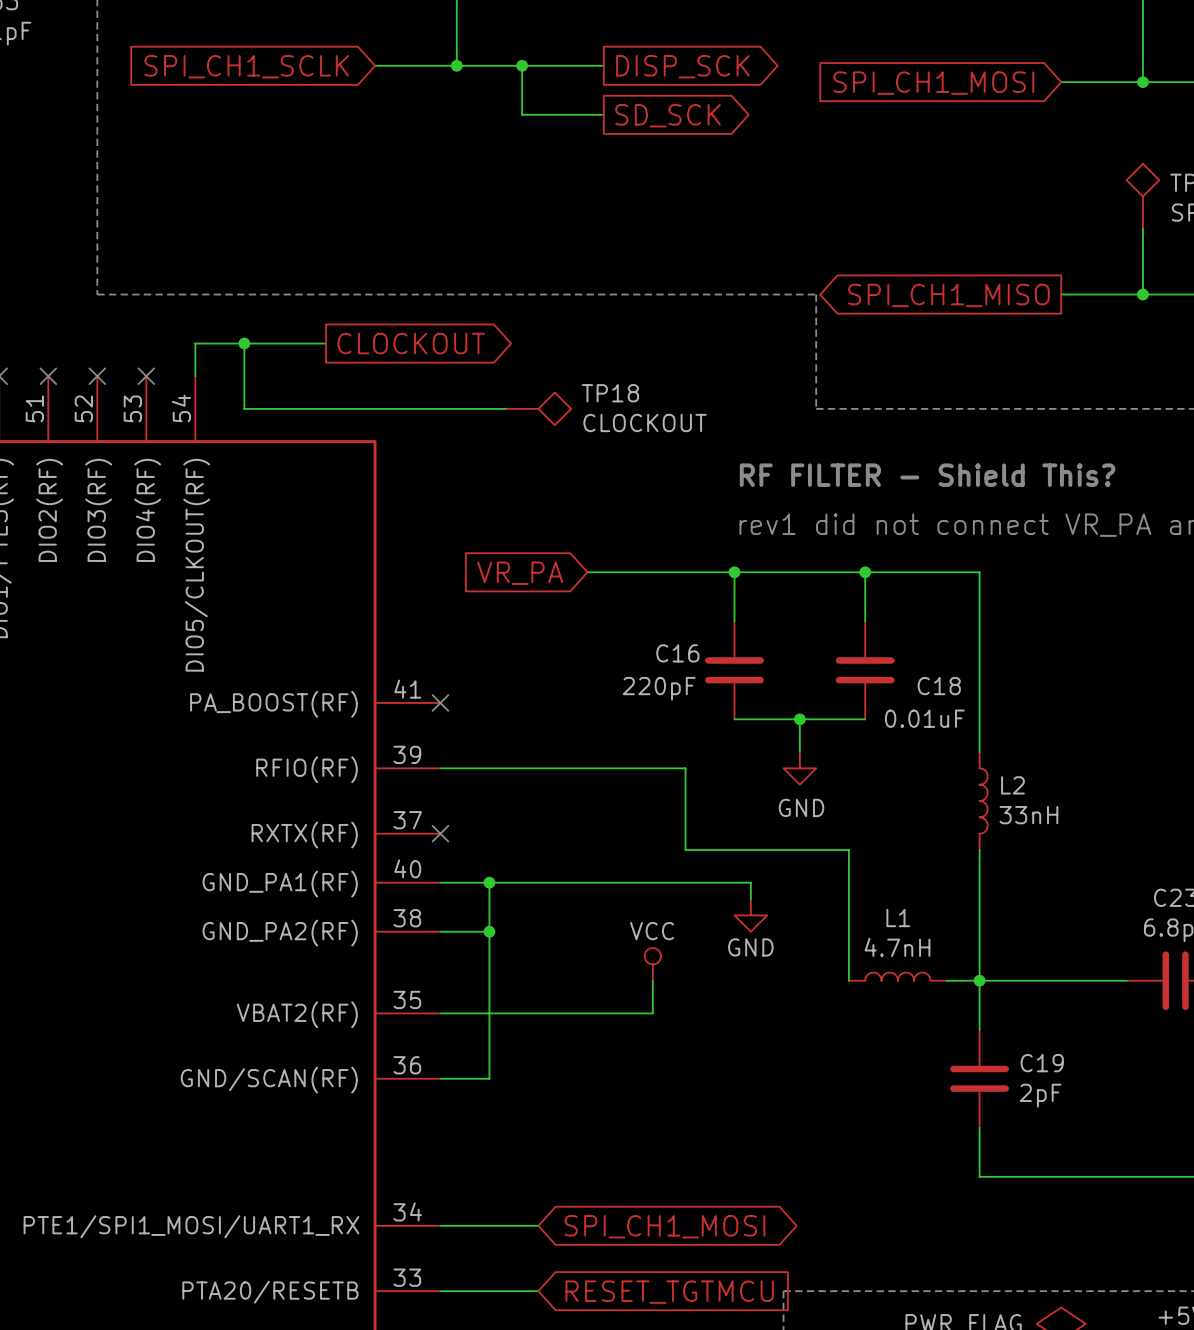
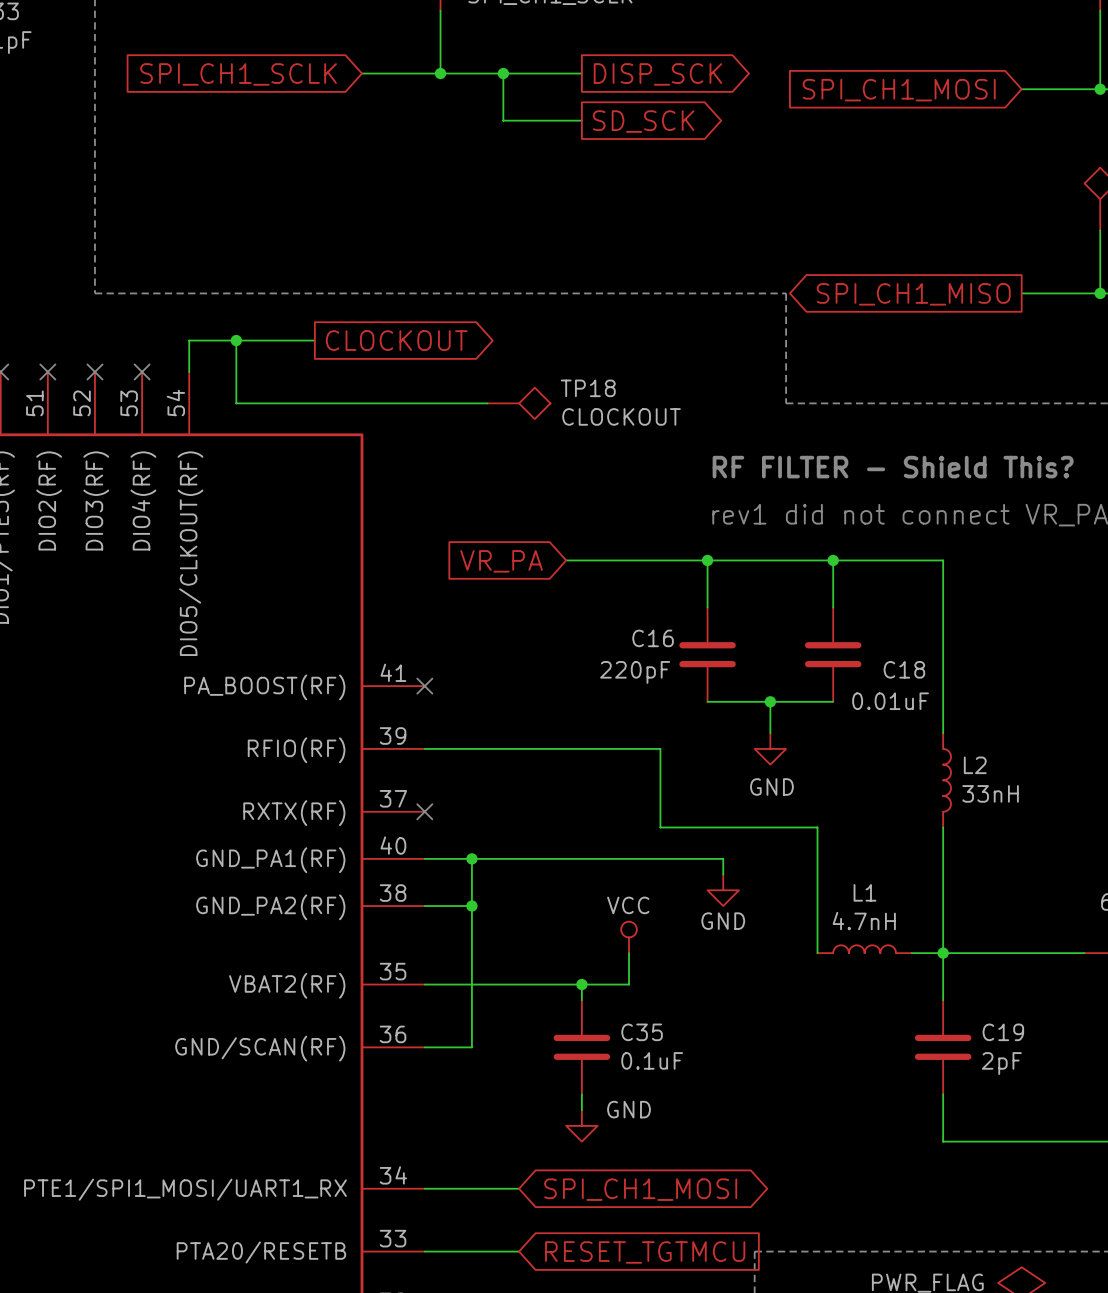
wire: none -> (581, 984) (581, 1000)
junction: none -> (581, 984)
C35: none -> 0.1uF (581, 1047)
wire: none -> (581, 1094) (581, 1110)
power symbol: none -> GND (581, 1125)

